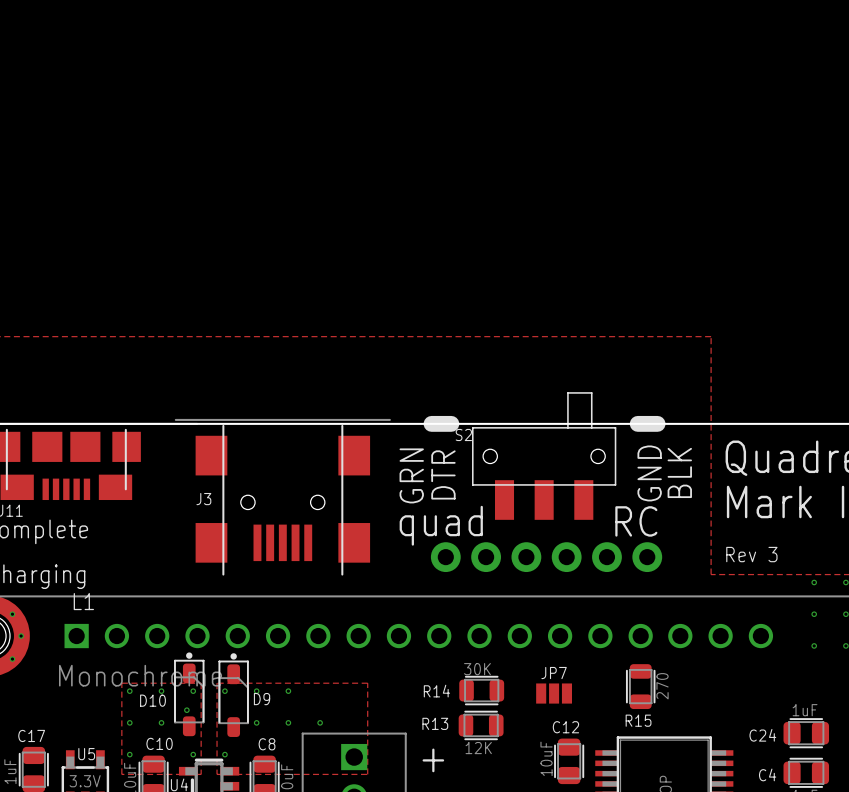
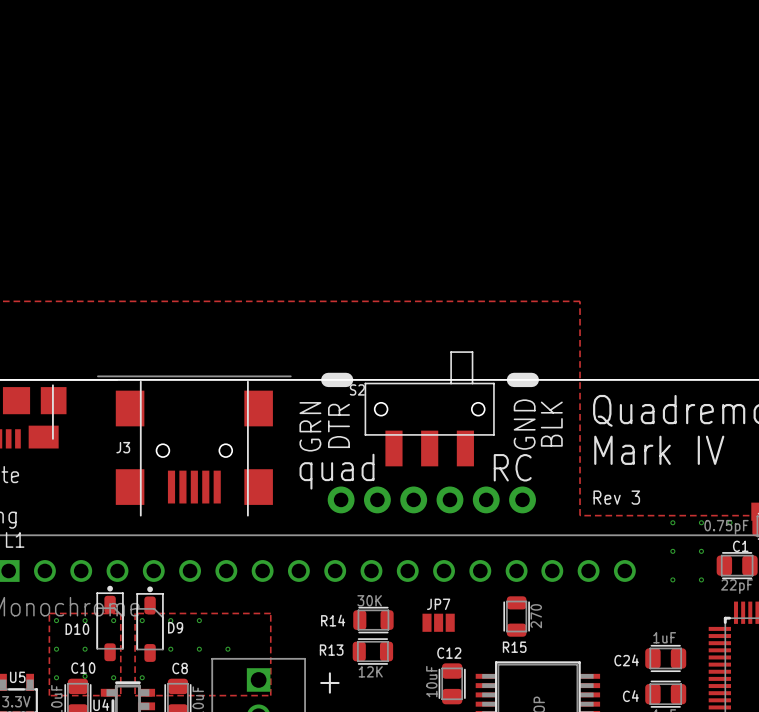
part position: (186, 710) -> (85, 676)

